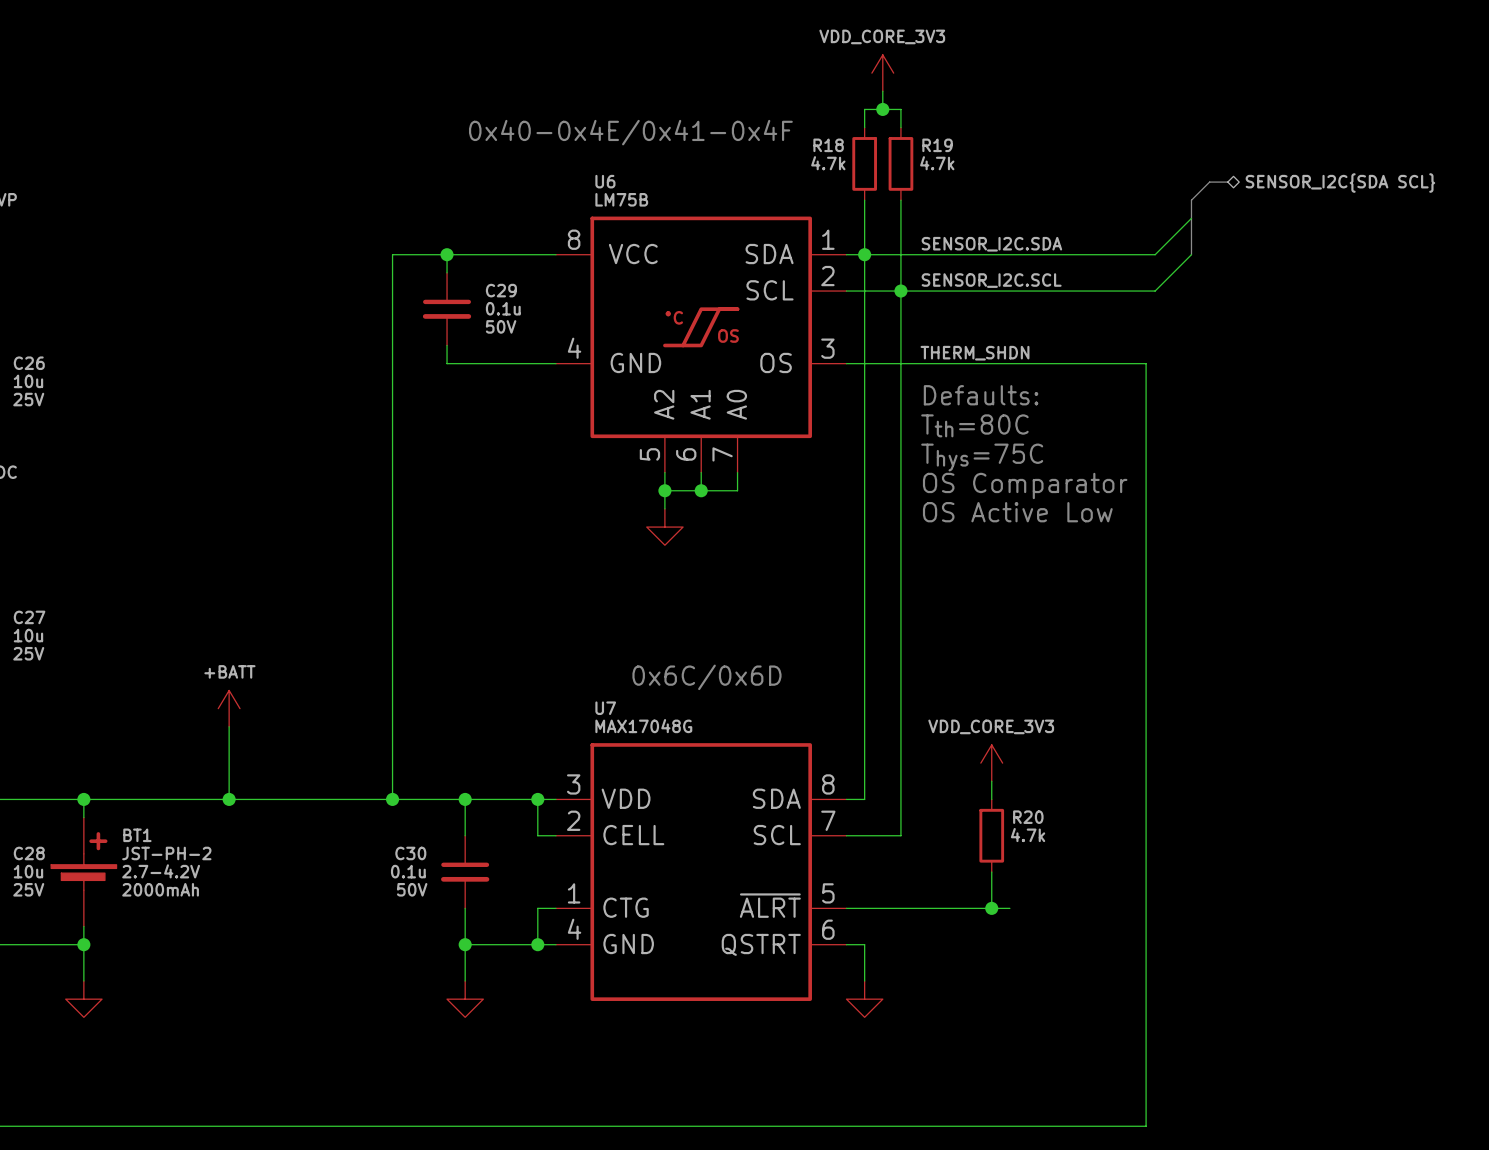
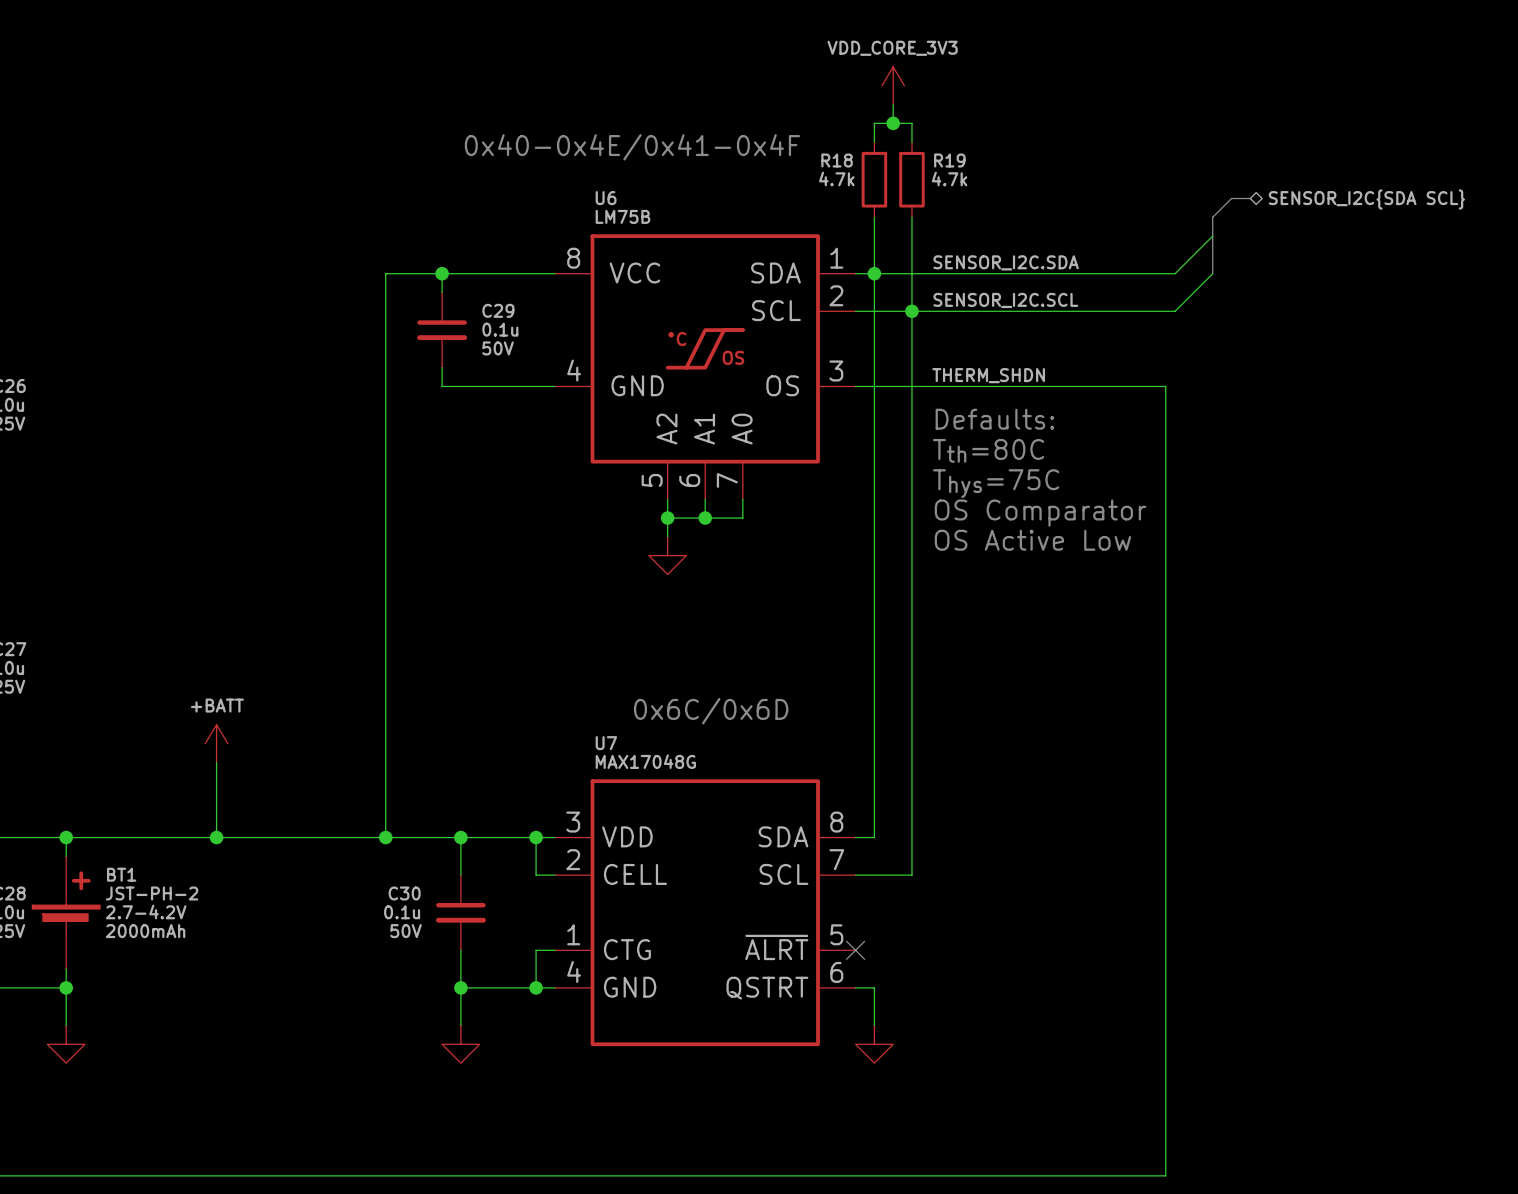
power symbol: VDD_CORE_3V3 (991, 763) -> none
wire: (991, 781) (991, 799) -> none
R20: 4.7k (991, 835) -> none
wire: (991, 872) (991, 908) -> none
wire: (846, 908) (1009, 908) -> none
no-connect mark: none -> (855, 950)
junction: (991, 908) -> none

